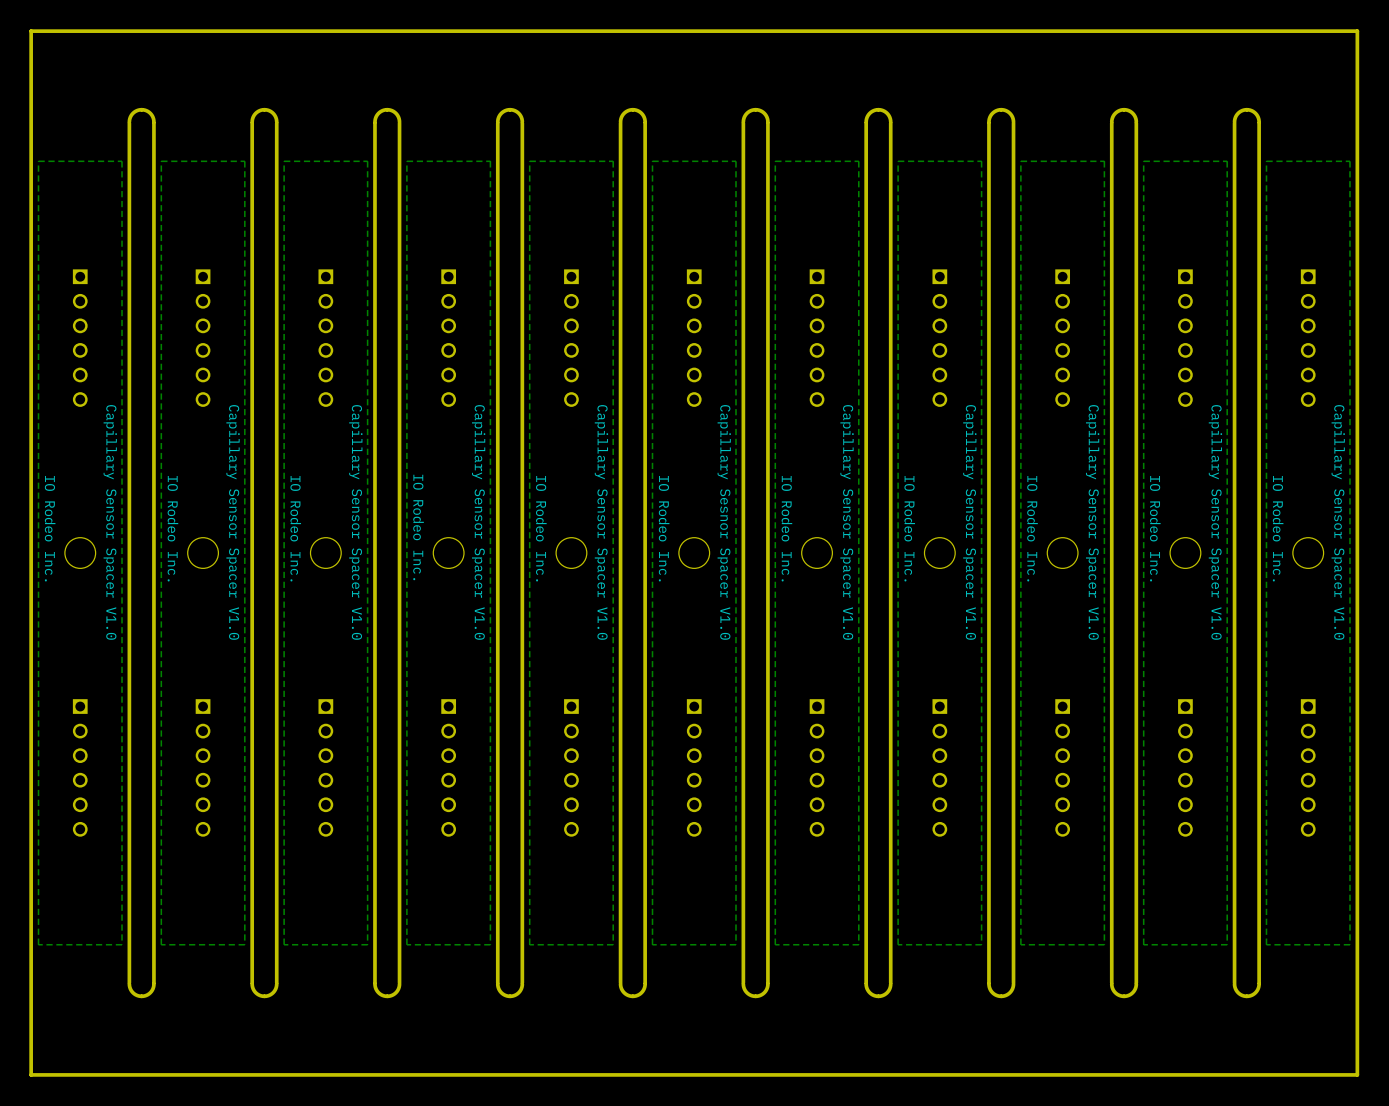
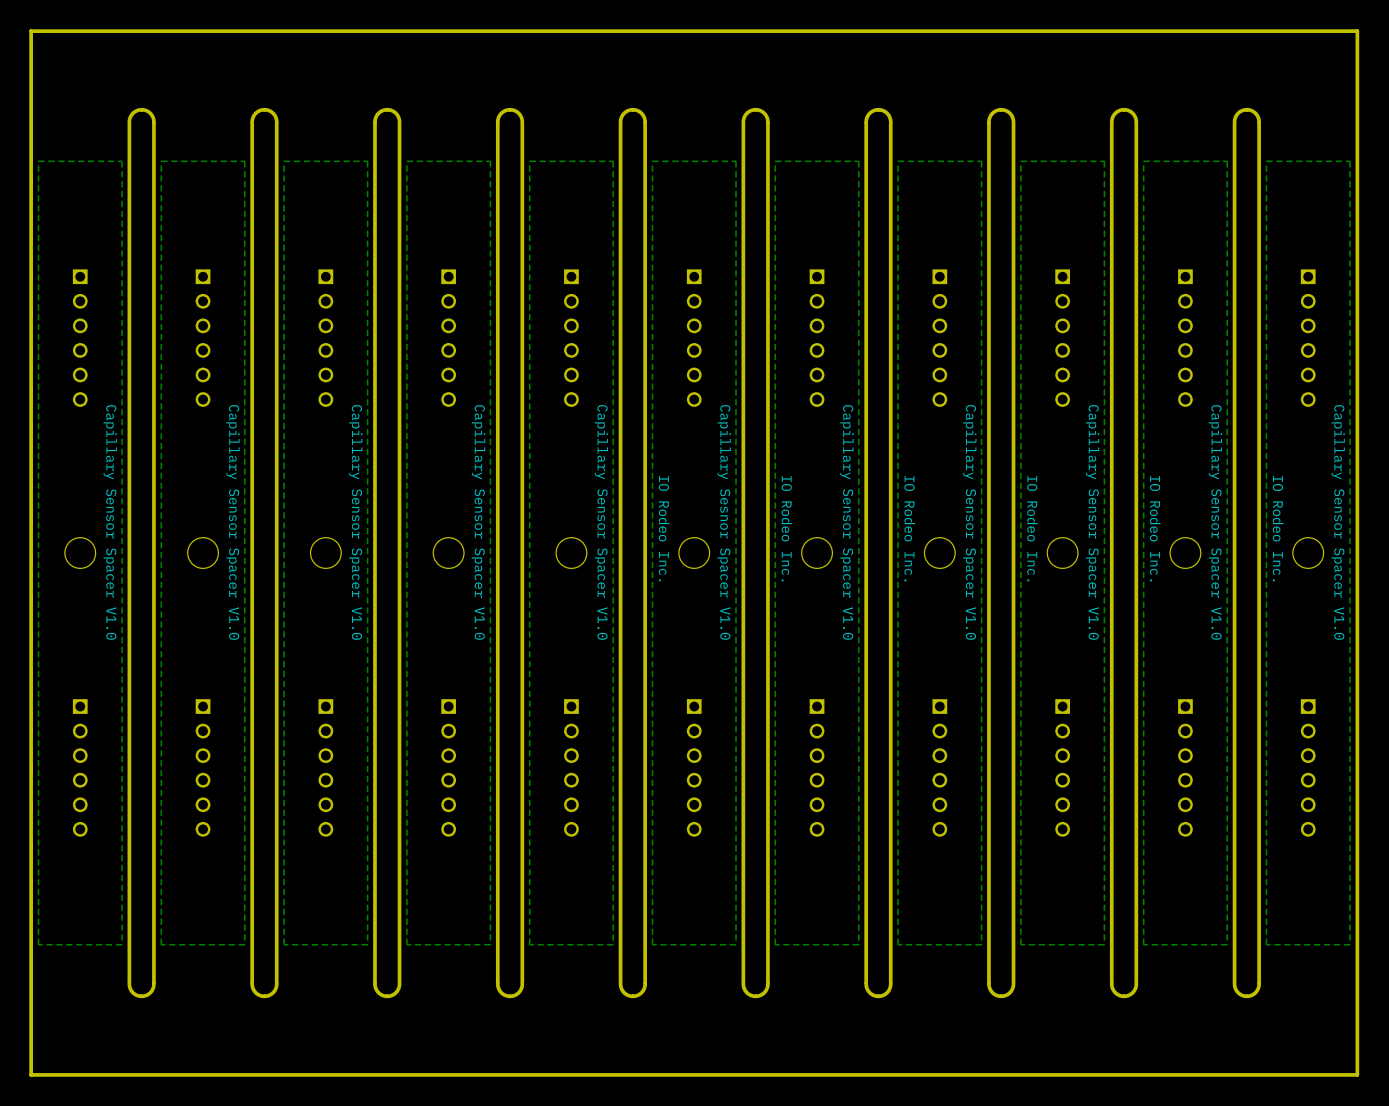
text: IO Rodeo Inc. (418, 527) -> none
text: IO Rodeo Inc. (50, 528) -> none
text: IO Rodeo Inc. (172, 528) -> none
text: IO Rodeo Inc. (295, 528) -> none
text: IO Rodeo Inc. (541, 528) -> none

